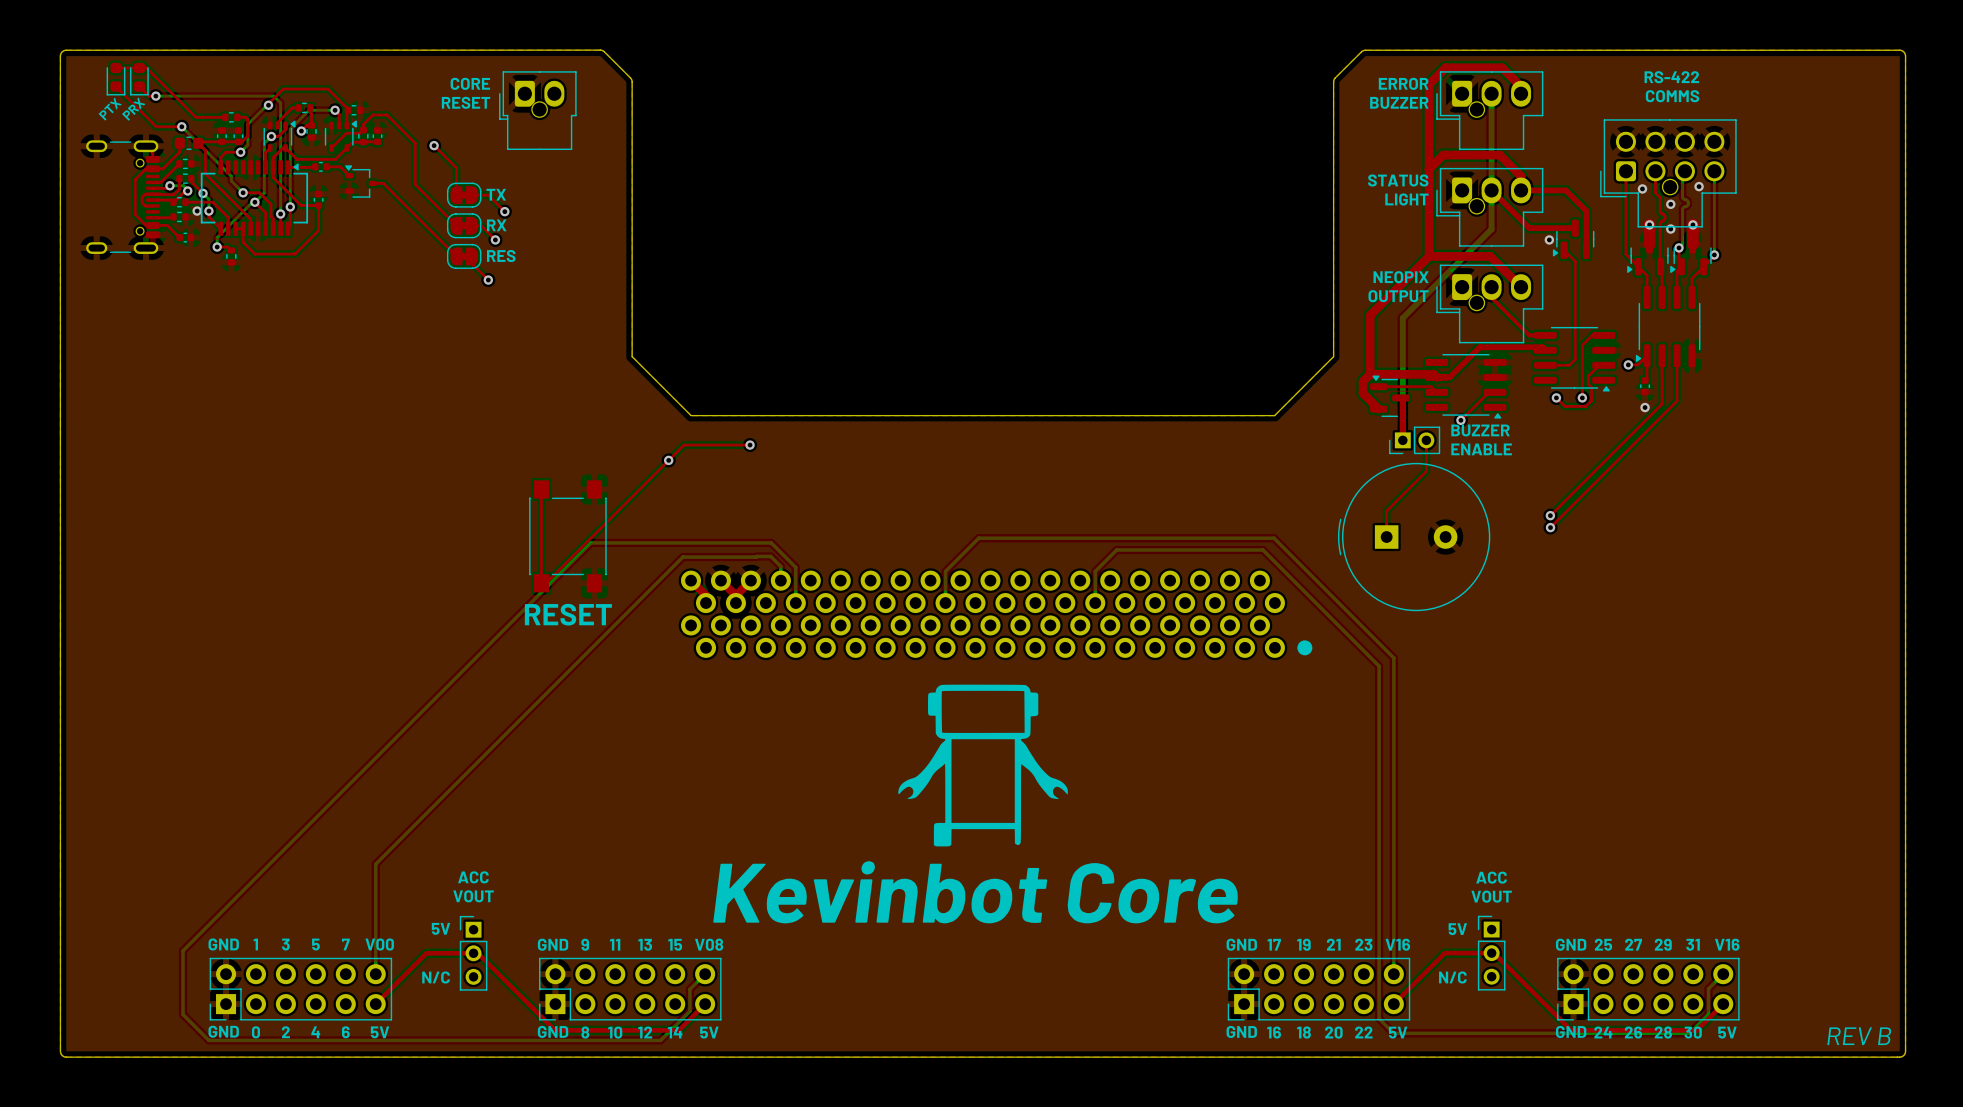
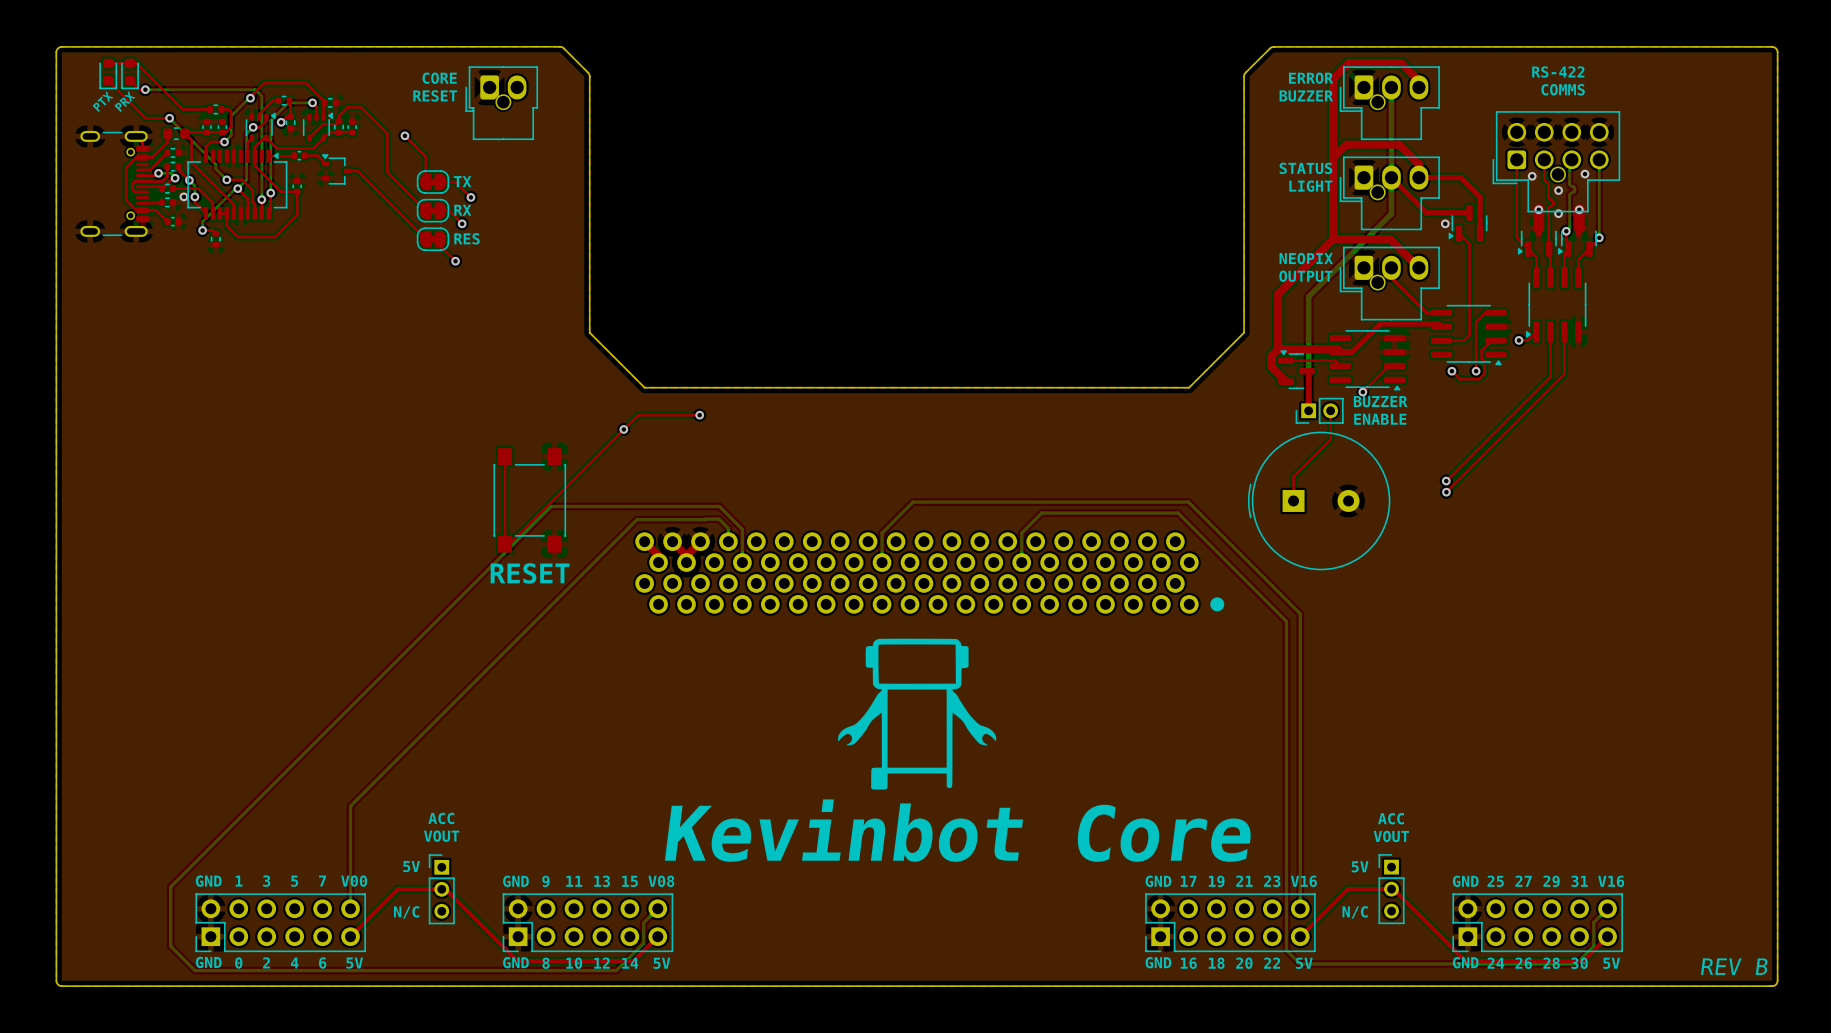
top track: (1647, 355) (1647, 378) (1645, 380) -> none
part: (1645, 386) -> none
via: (1645, 407) -> none

